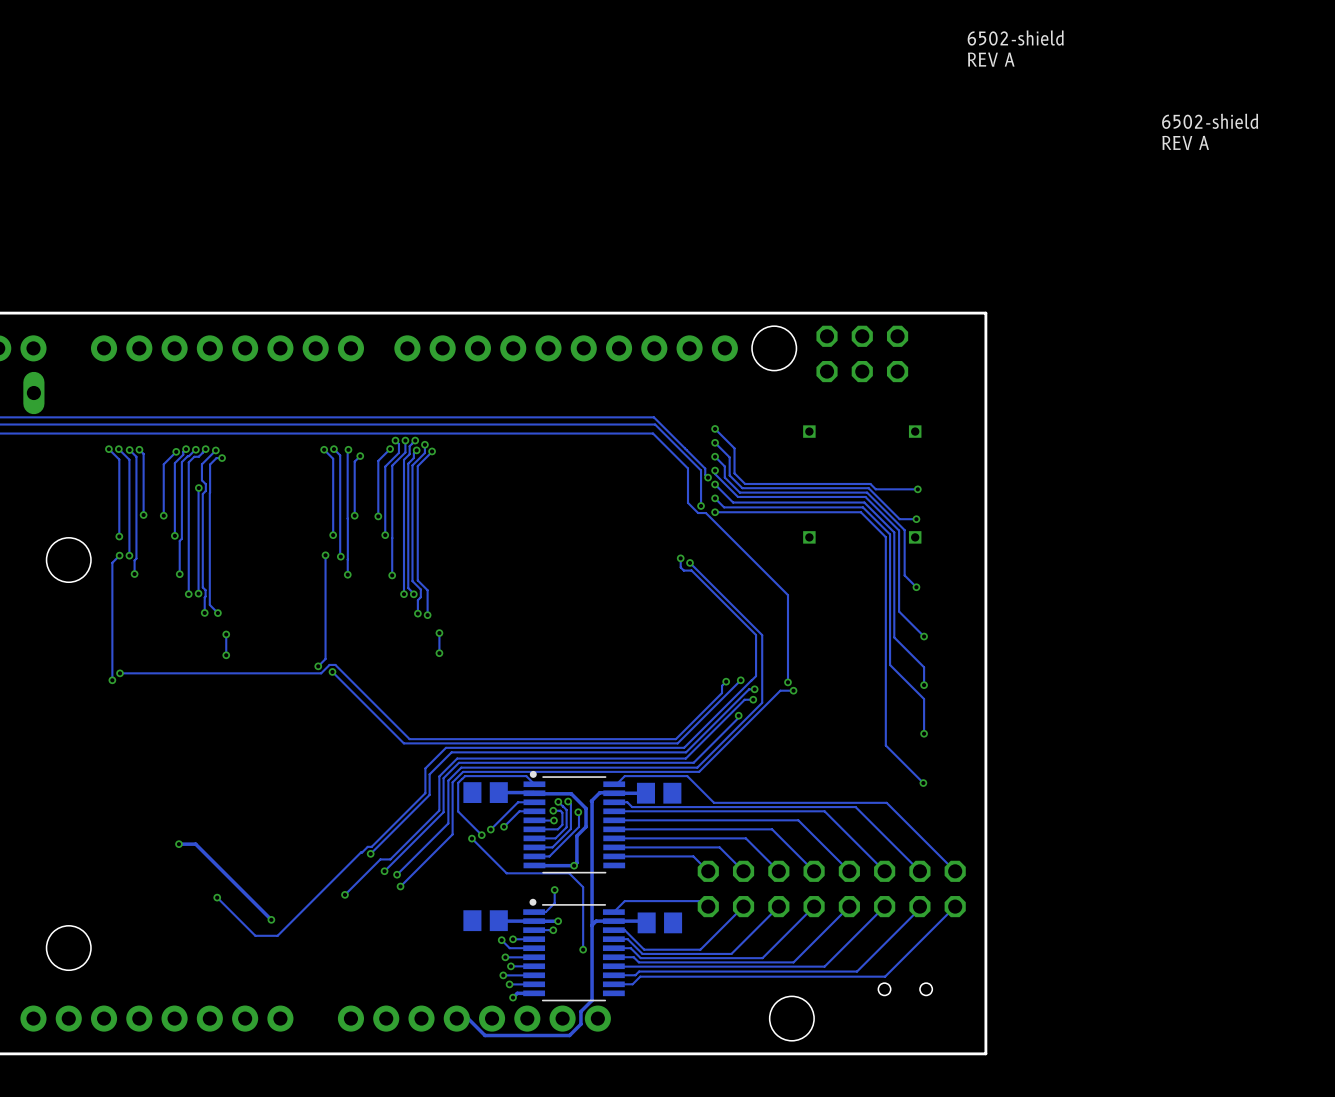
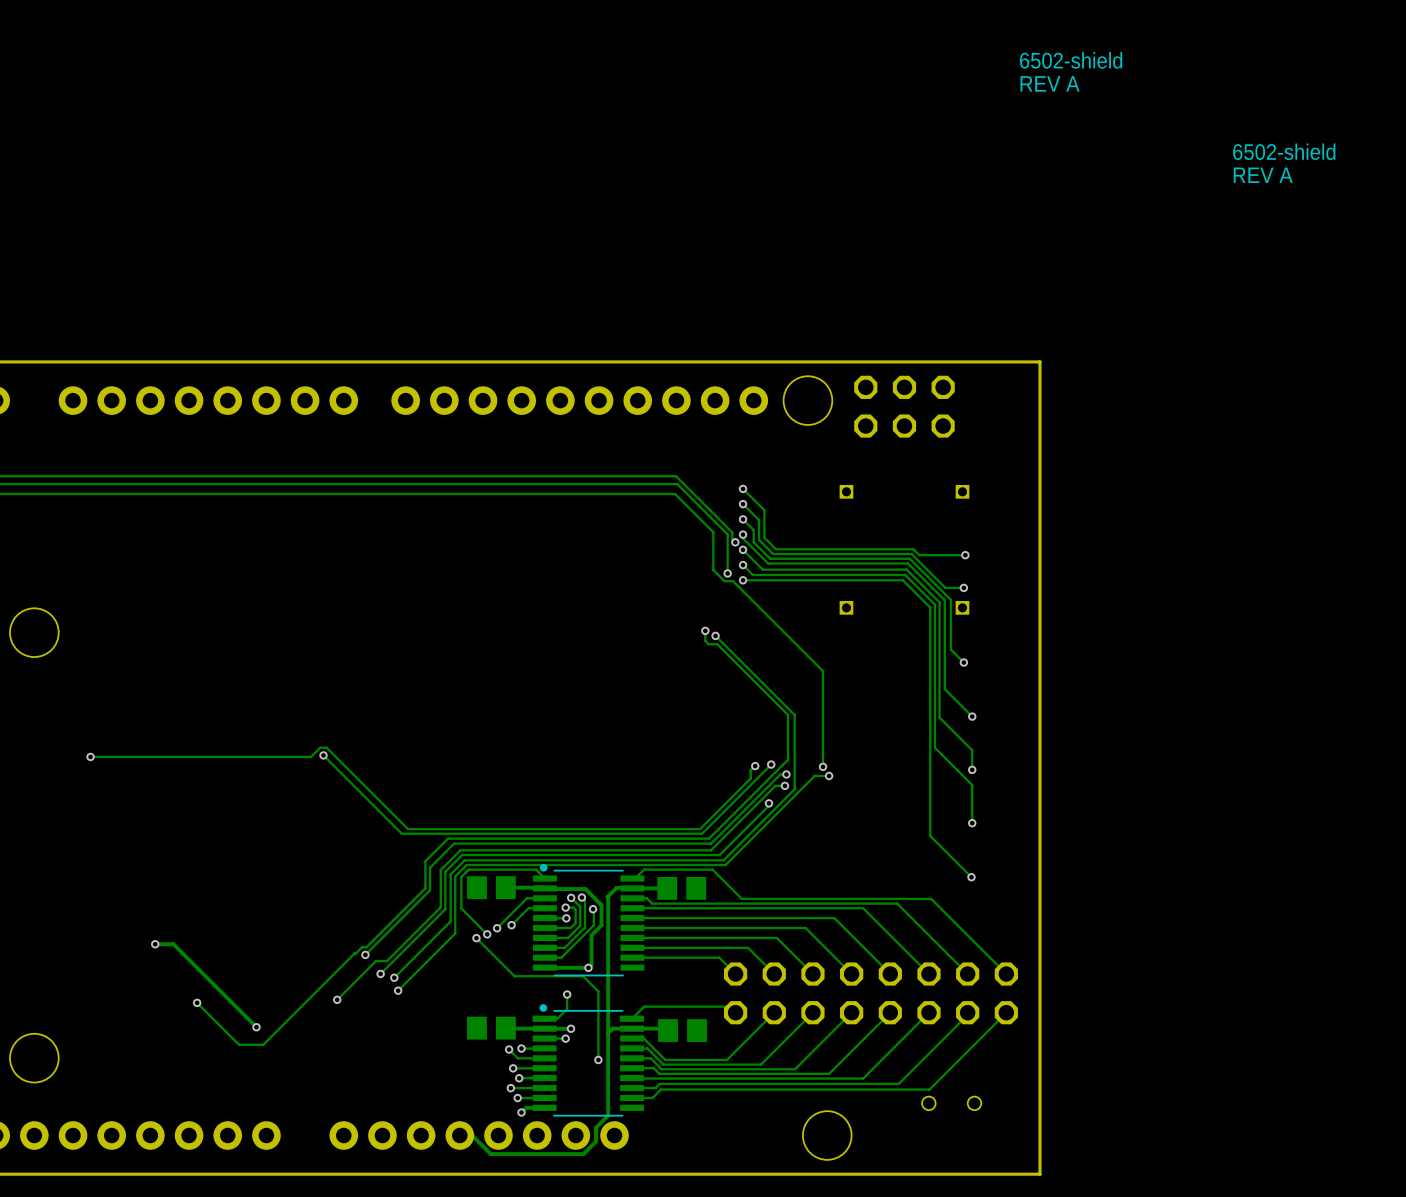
track: (395, 440) (398, 444) (398, 452) (385, 466) (385, 535) -> none
via: (395, 440) -> none
track: (405, 440) (405, 452) (392, 465) (392, 538) -> none
via: (405, 440) -> none
track: (415, 440) (409, 446) (409, 454) (404, 459) (404, 594) -> none
via: (415, 440) -> none
track: (424, 444) (424, 452) (412, 465) (412, 581) (420, 589) (420, 597) (417, 600) (417, 613) -> none
via: (424, 444) -> none
track: (108, 449) (119, 459) (119, 536) -> none
via: (108, 449) -> none
track: (118, 449) (129, 459) (129, 555) -> none
via: (118, 449) -> none
track: (139, 449) (143, 453) (143, 515) -> none
via: (139, 449) -> none
track: (186, 449) (174, 463) (174, 535) -> none
via: (186, 449) -> none
track: (195, 449) (181, 462) (179, 574) -> none
via: (195, 449) -> none
track: (205, 449) (198, 456) (194, 456) (188, 462) (188, 594) -> none
via: (205, 449) -> none
track: (324, 449) (333, 458) (333, 535) -> none
via: (324, 449) -> none
track: (333, 449) (340, 455) (340, 556) -> none
via: (333, 449) -> none
track: (348, 449) (347, 518) -> none
via: (348, 449) -> none
track: (390, 449) (378, 460) (378, 516) -> none
via: (390, 449) -> none
track: (129, 450) (136, 456) (136, 558) (134, 560) (134, 574) -> none
via: (129, 450) -> none
track: (215, 450) (201, 464) (201, 480) (205, 484) (205, 490) (202, 494) (202, 587) (205, 590) (204, 612) -> none
via: (215, 450) -> none
track: (416, 450) (413, 453) (413, 458) (408, 463) (408, 588) (413, 594) -> none
via: (416, 450) -> none
track: (176, 451) (163, 464) (163, 515) -> none
via: (176, 451) -> none
track: (432, 451) (417, 466) (417, 580) (427, 590) (427, 615) -> none
via: (432, 451) -> none
track: (360, 456) (354, 461) (354, 515) -> none
via: (360, 456) -> none
track: (222, 458) (216, 458) (210, 464) (209, 604) (217, 613) -> none
via: (222, 458) -> none
track: (198, 488) (198, 593) -> none
via: (198, 488) -> none
via: (143, 515) -> none
via: (163, 515) -> none
via: (354, 515) -> none
via: (378, 516) -> none
track: (347, 518) (347, 559) -> none
via: (174, 535) -> none
via: (333, 535) -> none
via: (385, 535) -> none
via: (119, 536) -> none
track: (392, 538) (392, 575) -> none
track: (119, 555) (112, 562) (112, 680) -> none
via: (119, 555) -> none
via: (129, 555) -> none
track: (325, 555) (325, 659) (318, 666) -> none
via: (325, 555) -> none
via: (340, 556) -> none
track: (347, 559) (347, 574) -> none
via: (134, 574) -> none
via: (179, 574) -> none
via: (347, 574) -> none
via: (392, 575) -> none
via: (198, 593) -> none
via: (188, 594) -> none
via: (404, 594) -> none
via: (413, 594) -> none
via: (204, 612) -> none
via: (217, 613) -> none
via: (417, 613) -> none
via: (427, 615) -> none
track: (439, 633) (439, 653) -> none
via: (439, 633) -> none
track: (226, 634) (226, 655) -> none
via: (226, 634) -> none
via: (439, 653) -> none
via: (226, 655) -> none
via: (318, 666) -> none
via: (112, 680) -> none

